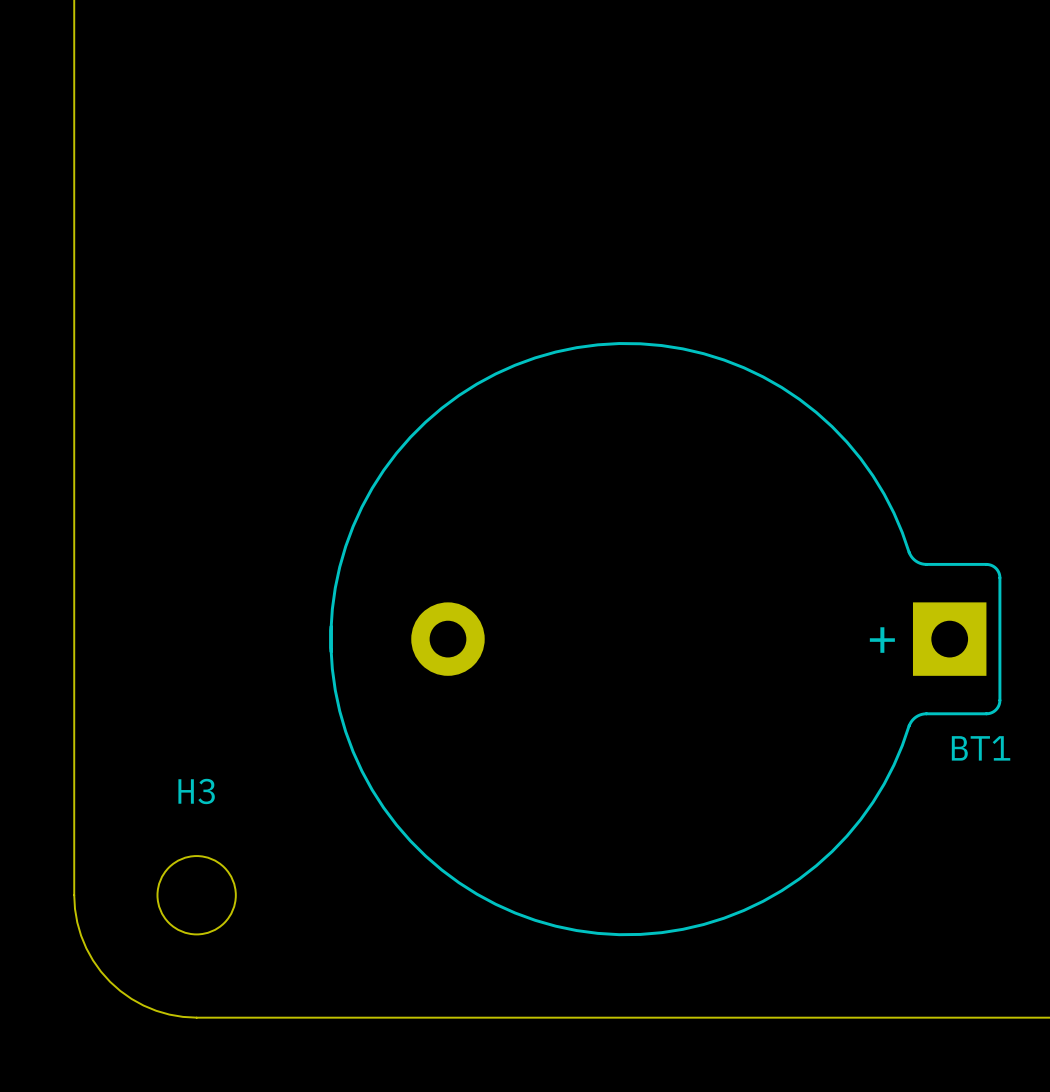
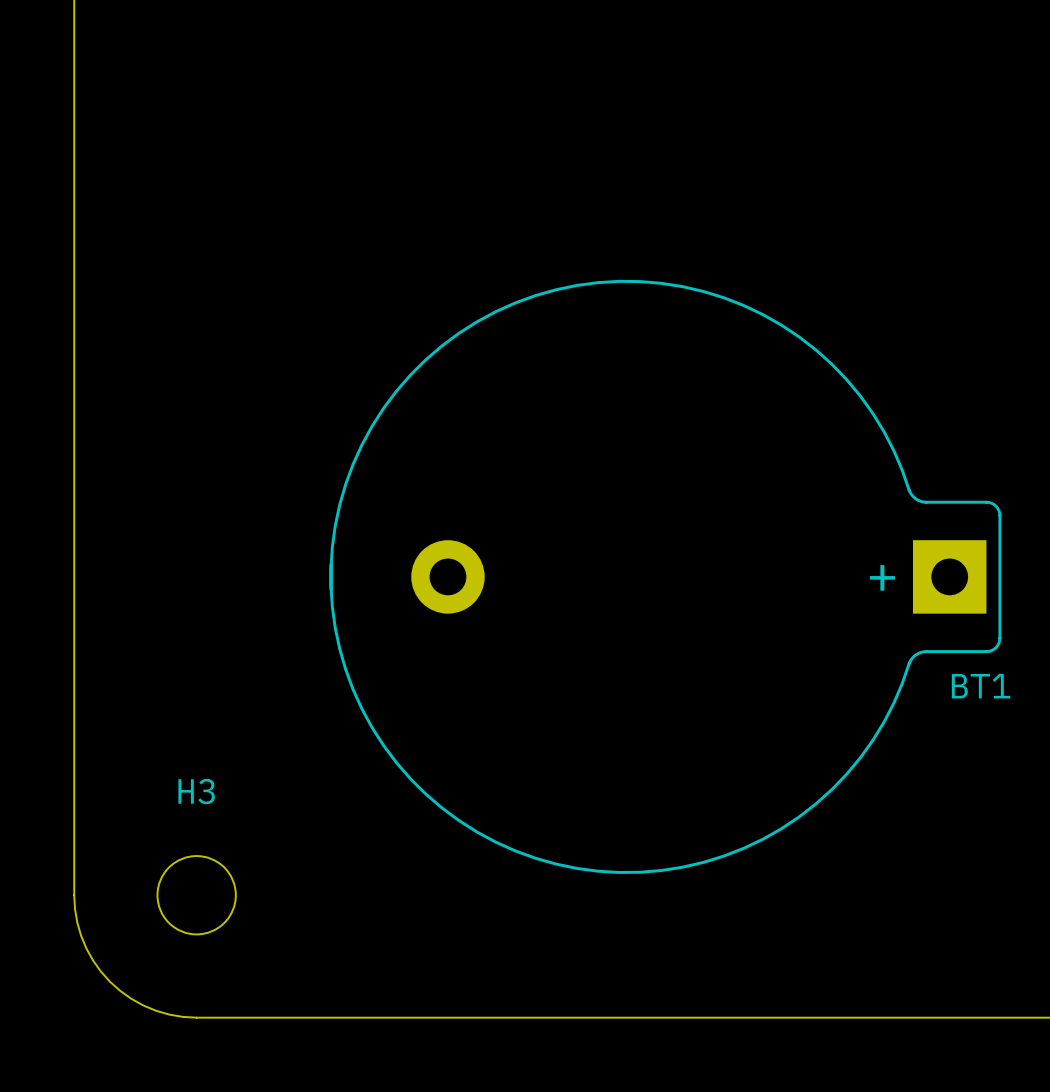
BT1 position: (665, 639) -> (665, 576)

